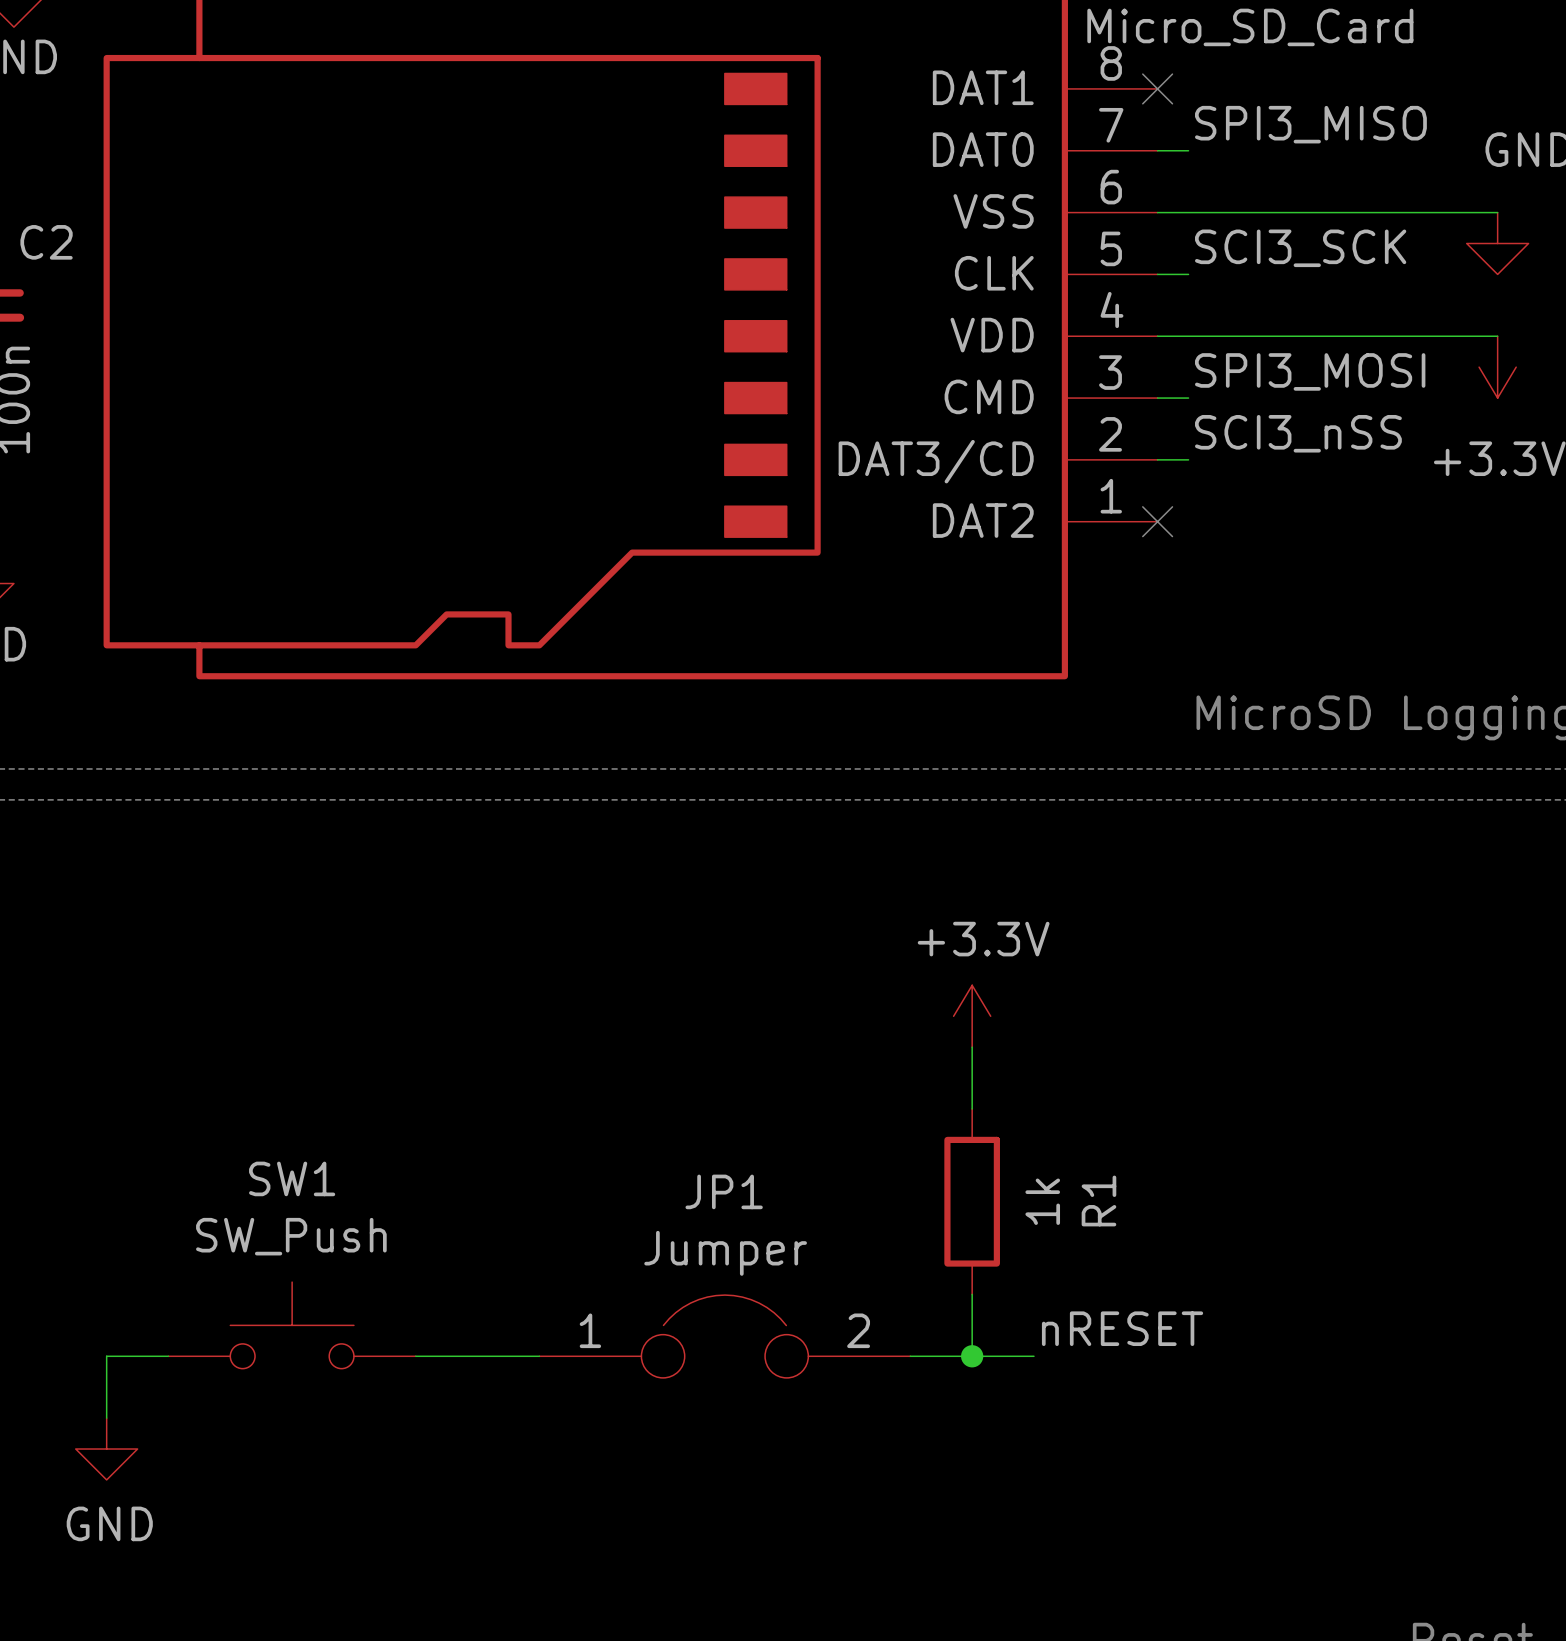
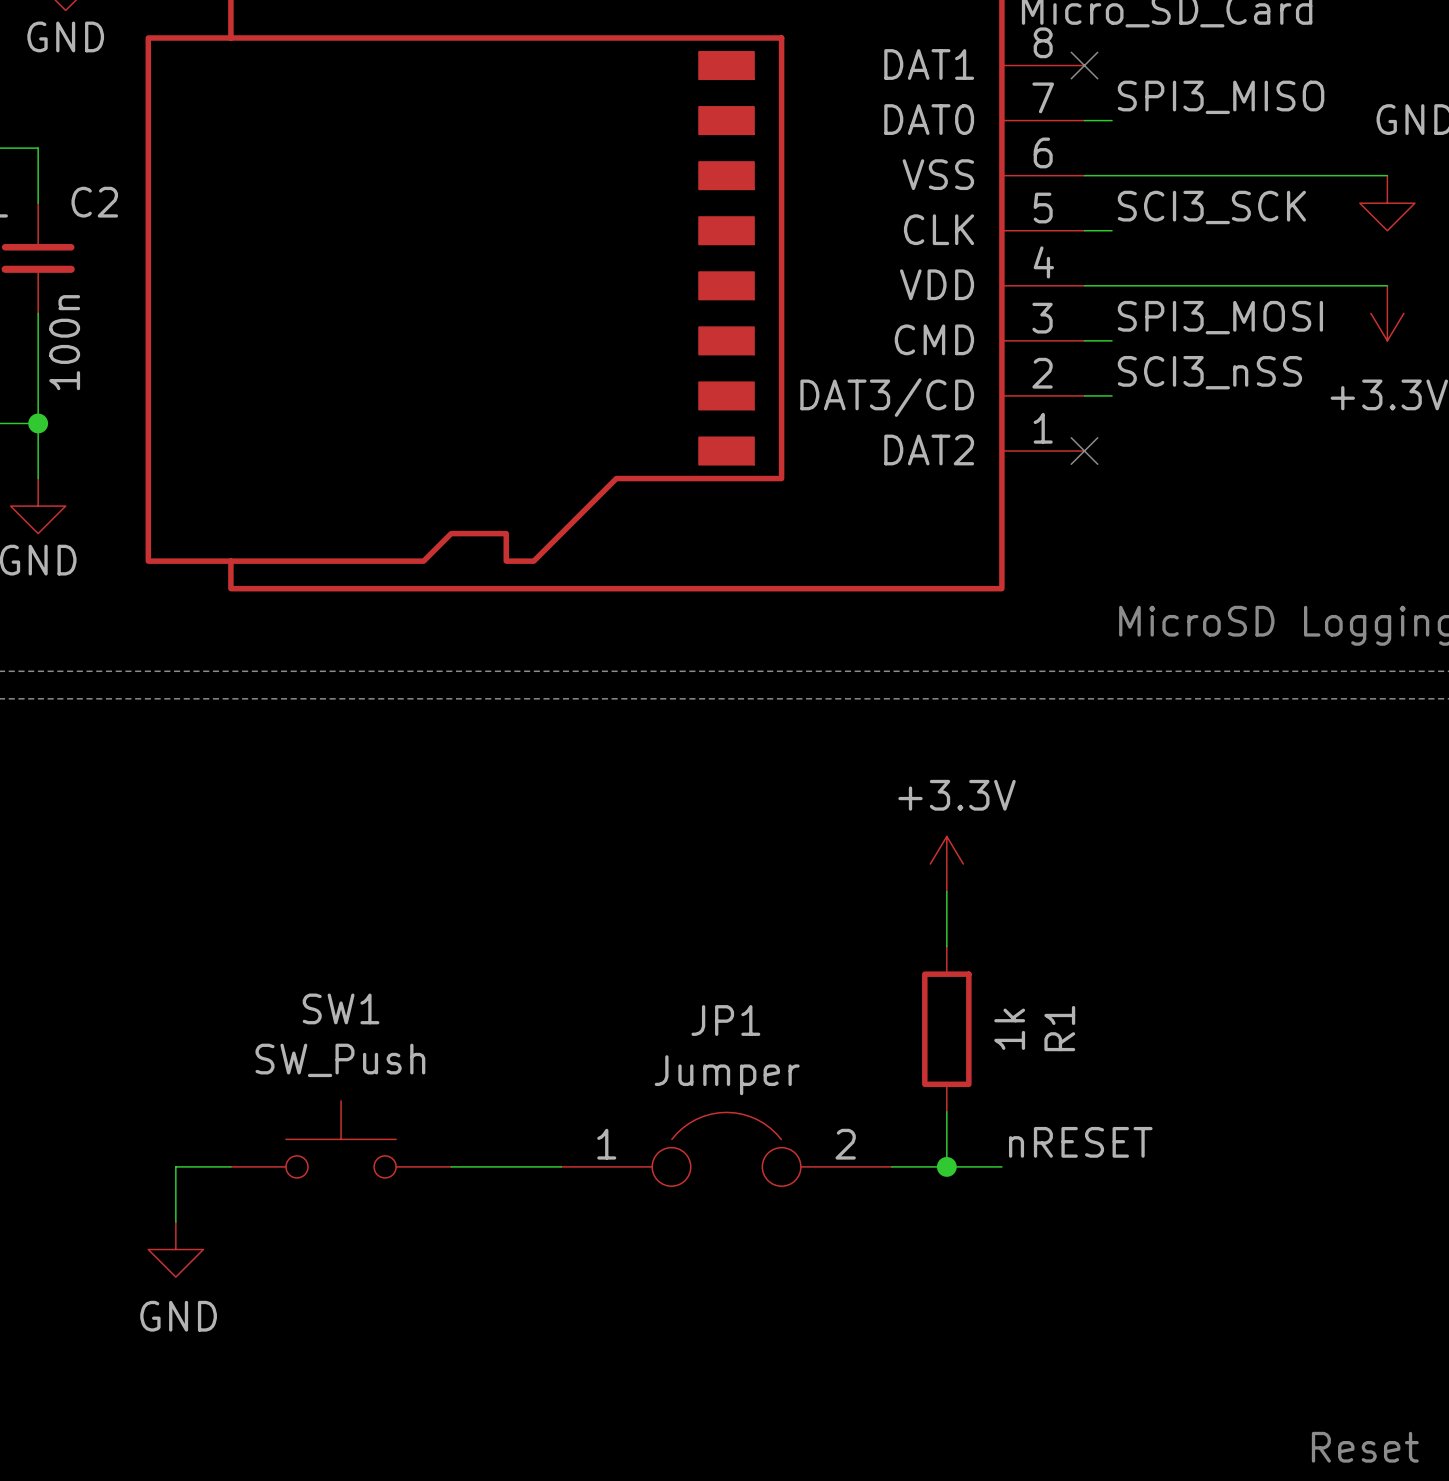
power symbol position: +3.3V (972, 1016) -> +3.3V (946, 864)
wire: (972, 1047) (972, 1109) -> (946, 891) (946, 946)
R1 position: (972, 1201) -> (946, 1029)
wire: (972, 1294) (972, 1356) -> (946, 1111) (946, 1166)
SW1 position: (292, 1325) -> (341, 1139)
label position: nRESET (1122, 1328) -> nRESET (1080, 1142)
JP1 position: (724, 1336) -> (726, 1149)
wire: (168, 1356) (106, 1356) (106, 1418) -> (230, 1166) (175, 1166) (175, 1221)
wire: (415, 1356) (539, 1356) -> (451, 1166) (561, 1166)
wire: (910, 1356) (1033, 1356) -> (891, 1166) (1001, 1166)
junction position: (972, 1356) -> (946, 1166)
power symbol position: GND (106, 1449) -> GND (175, 1249)

